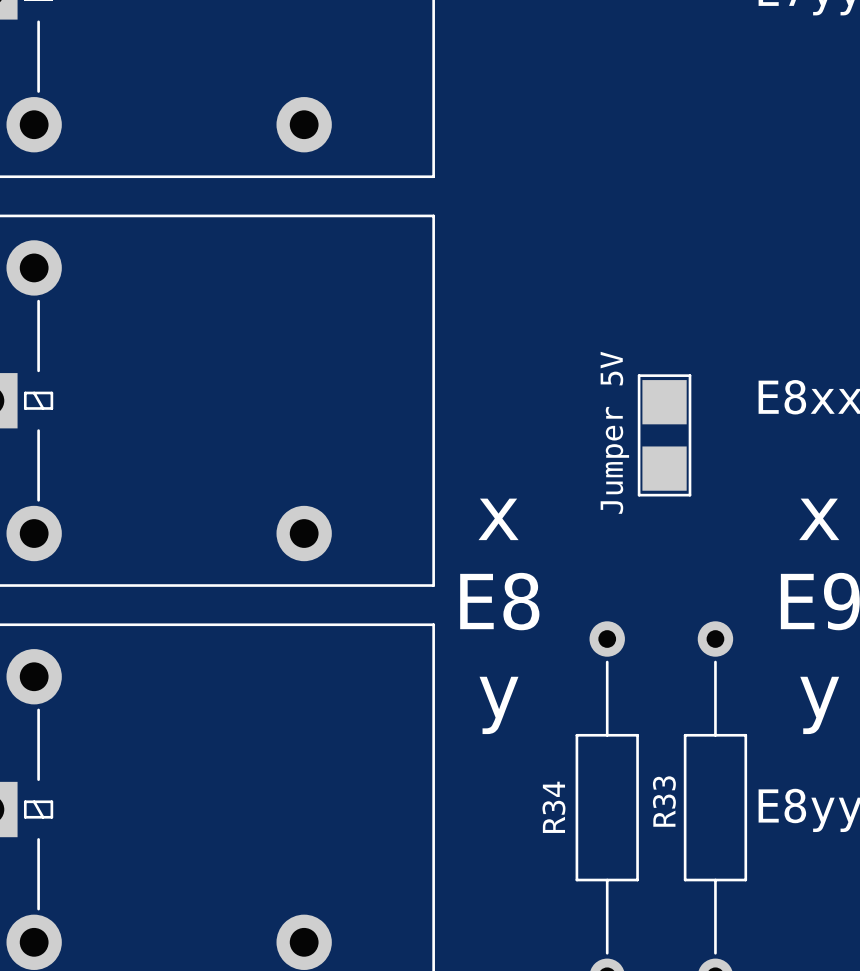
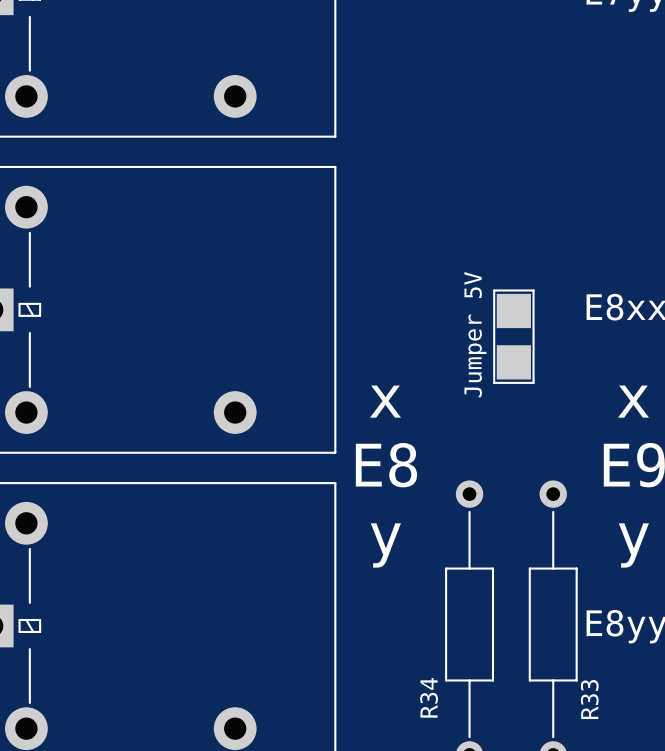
R33 name position: R33 (664, 801) -> R33 (589, 699)
R34 name position: R34 (553, 807) -> R34 (429, 697)

